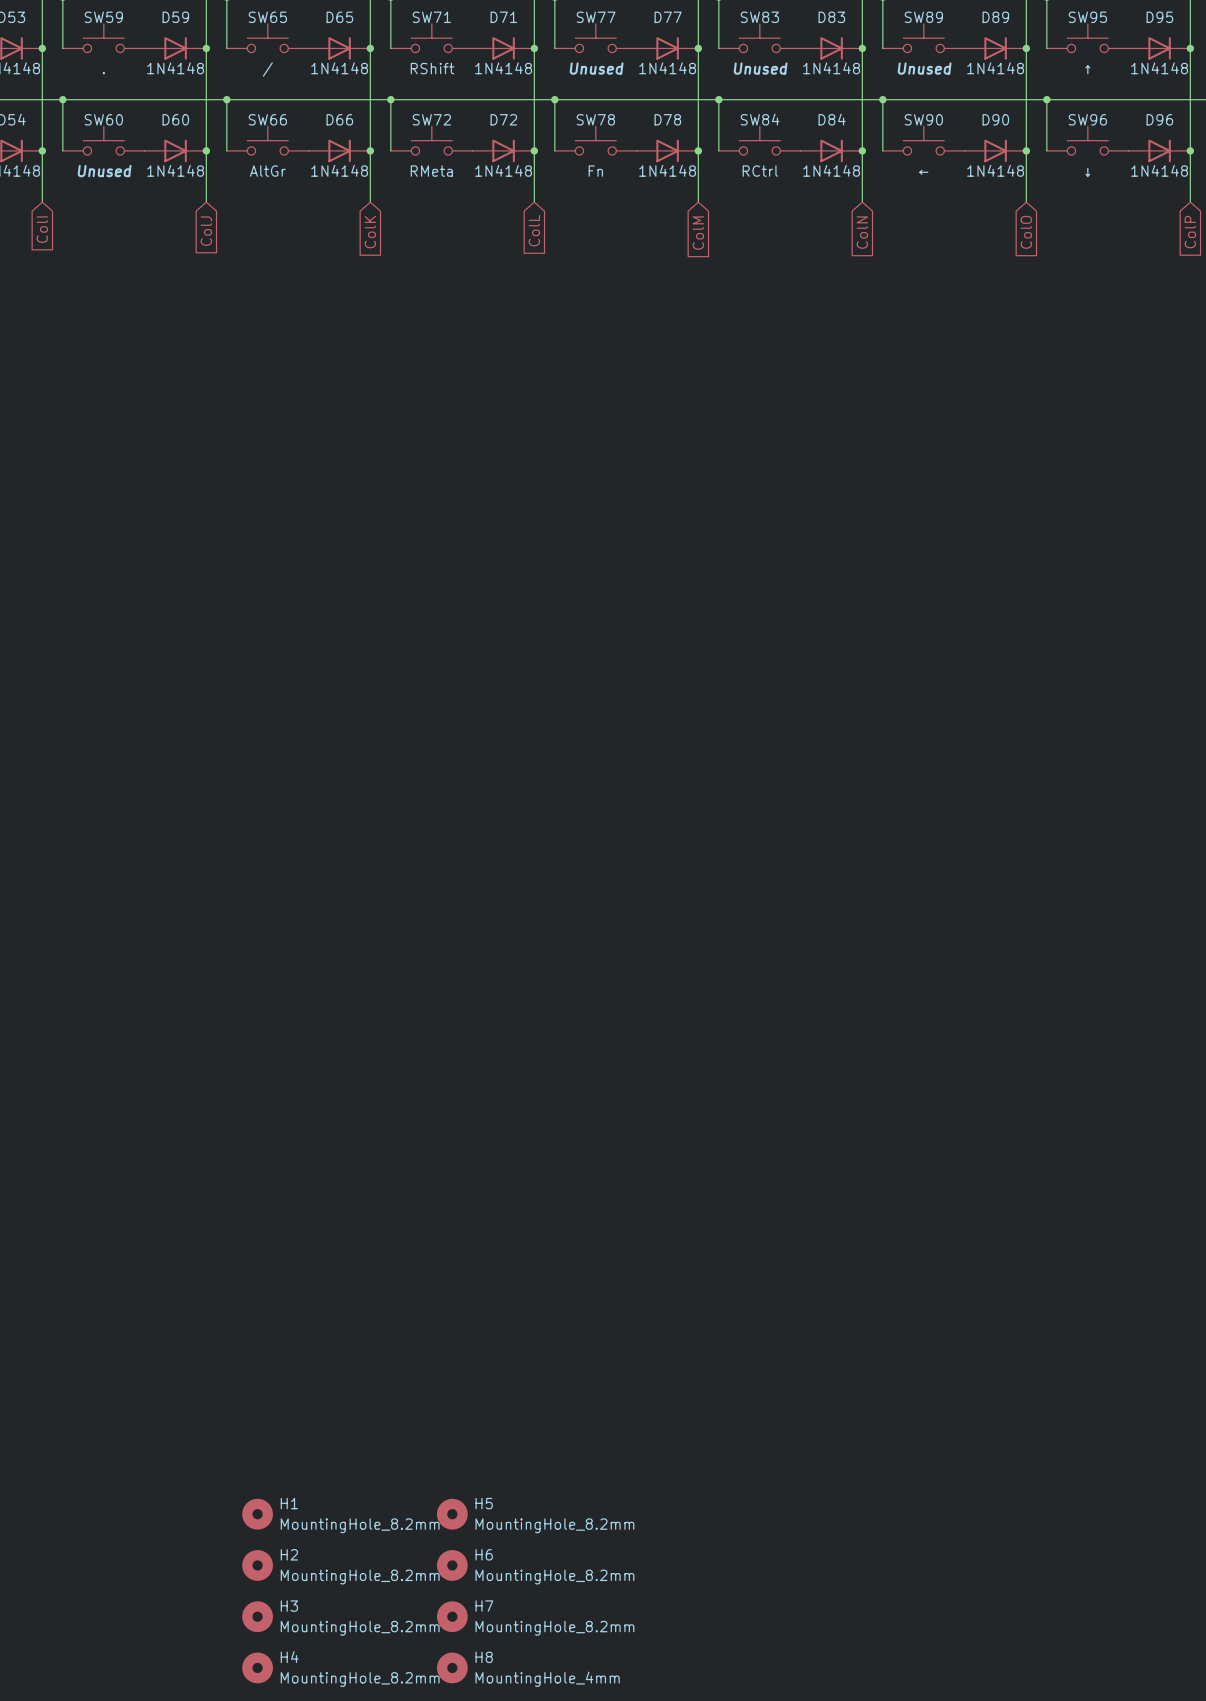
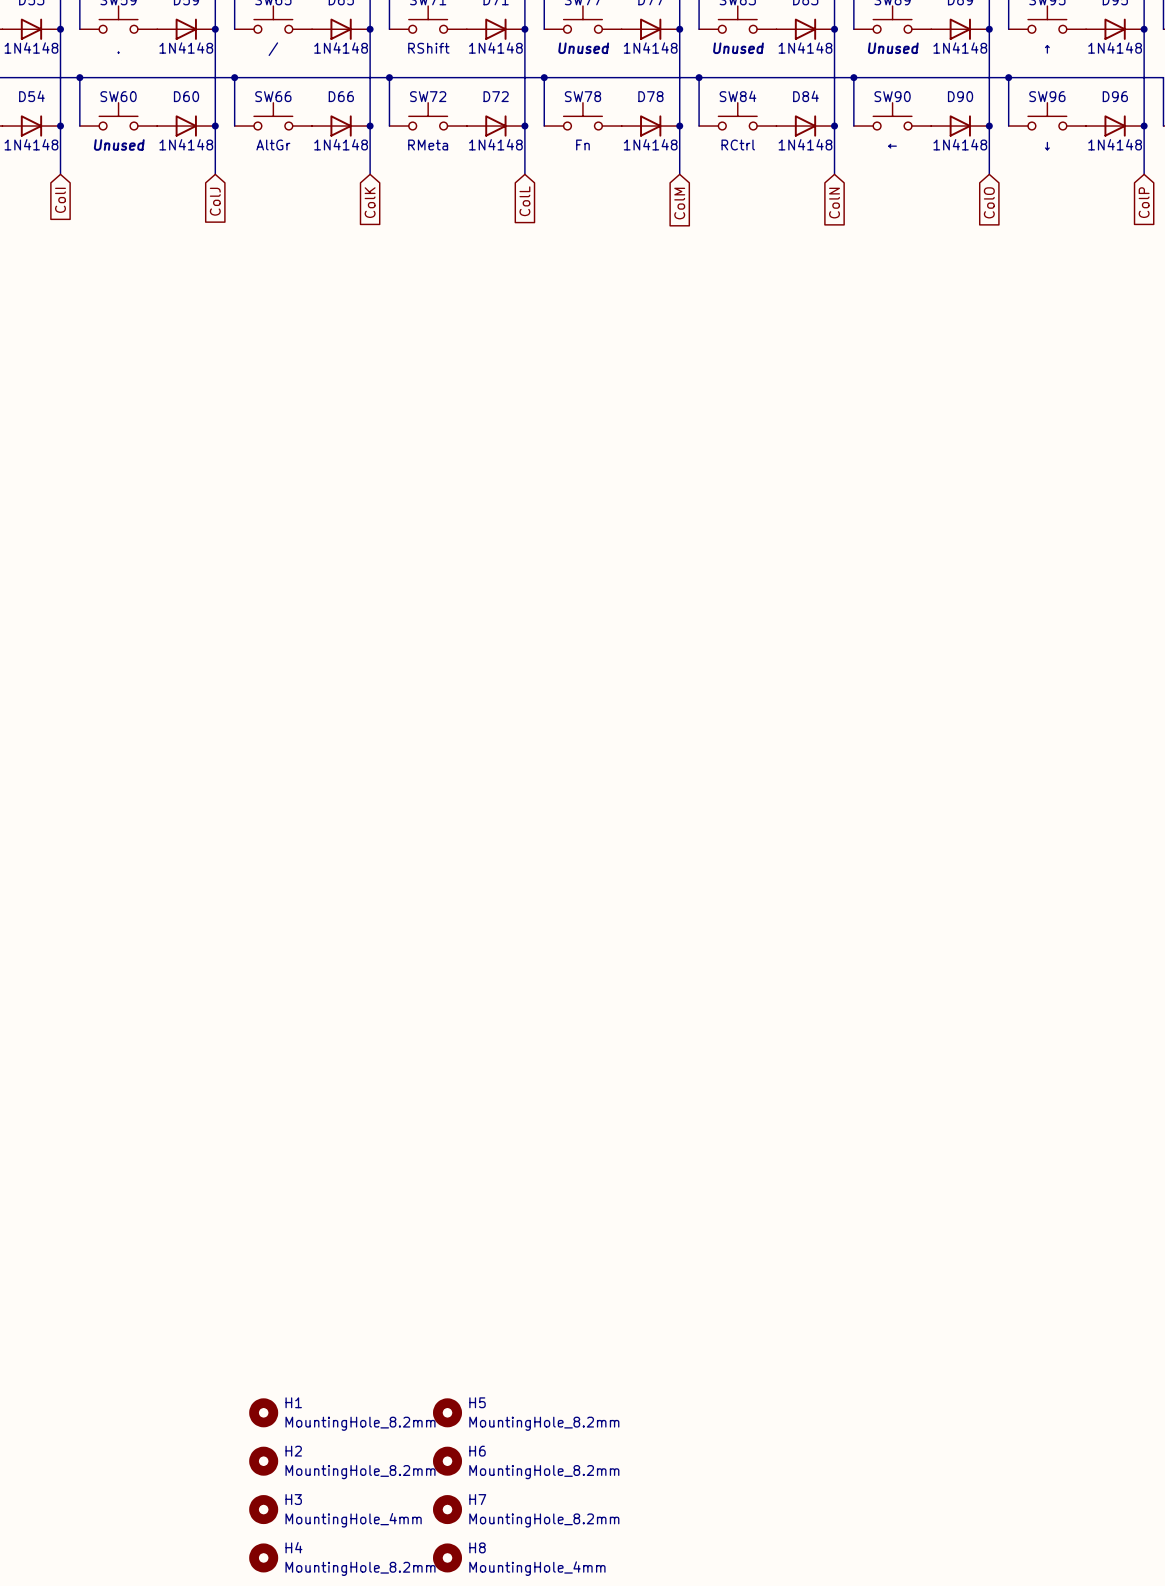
H3 value: MountingHole_8.2mm (360, 1628) -> MountingHole_4mm (353, 1520)

